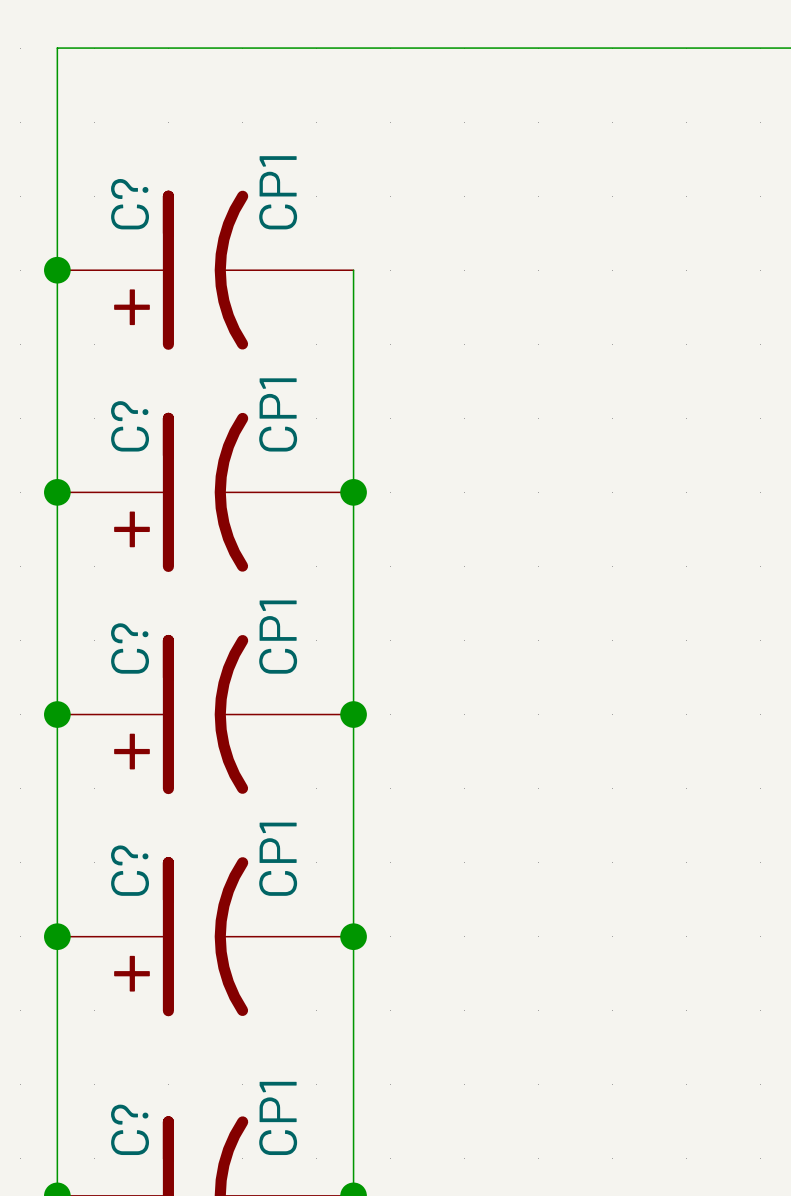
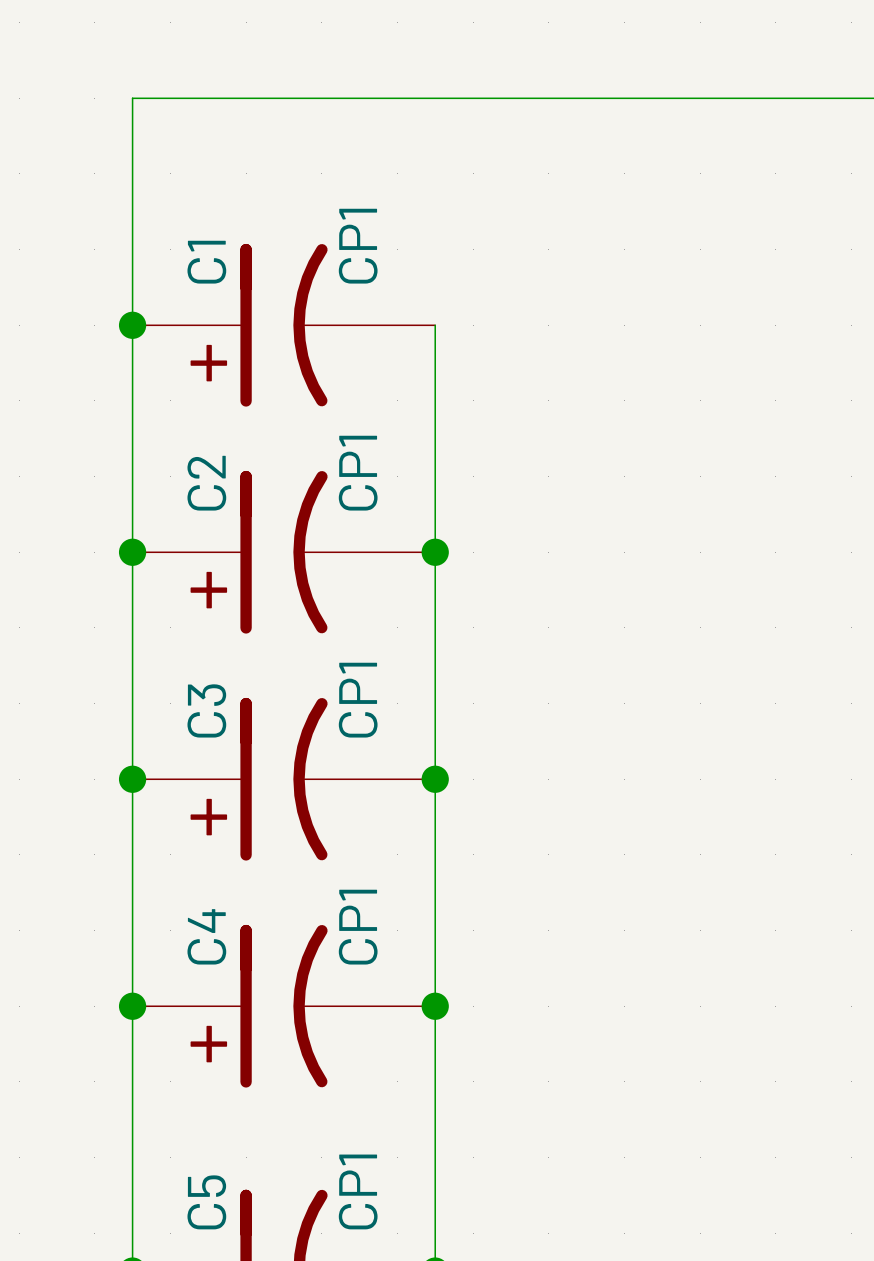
C? name: C? (130, 204) -> C1 (206, 262)
C? name: C? (130, 426) -> C2 (206, 483)
C? name: C? (130, 648) -> C3 (206, 710)
C? name: C? (130, 870) -> C4 (206, 936)
C? name: C? (130, 1129) -> C5 (206, 1202)

